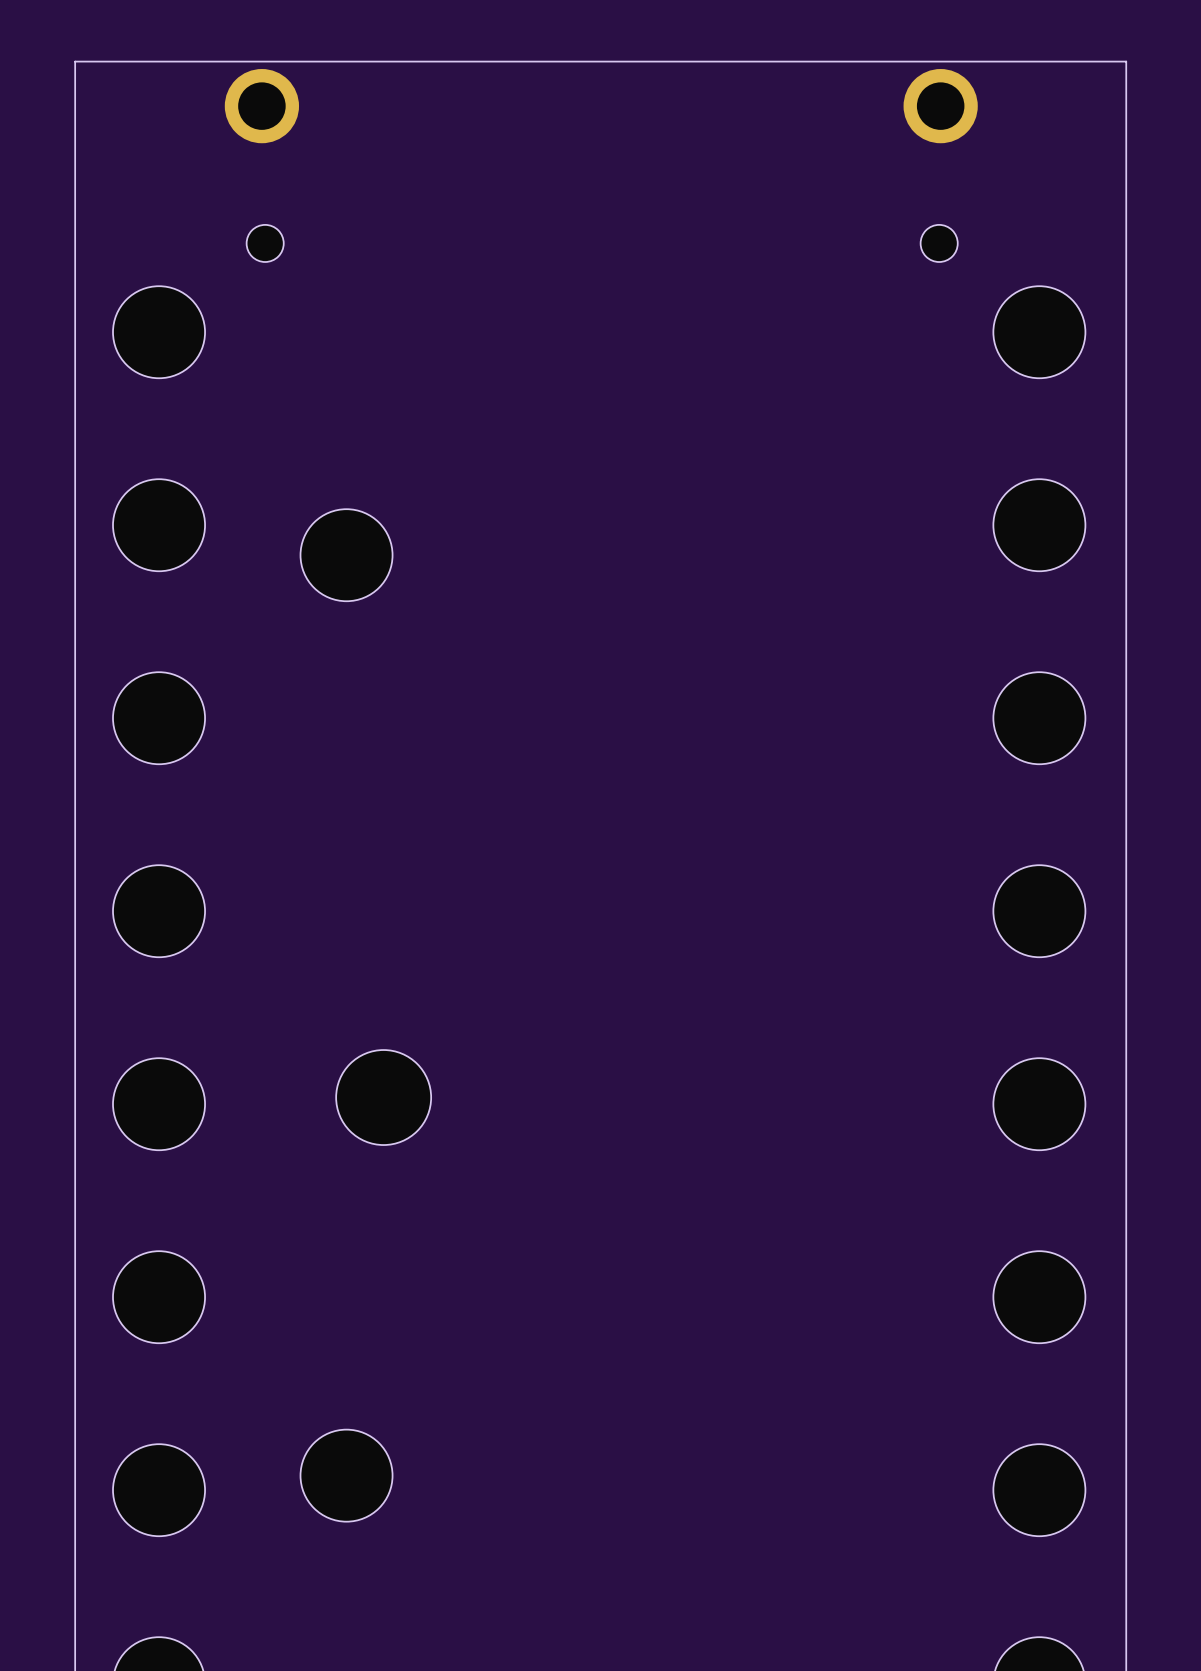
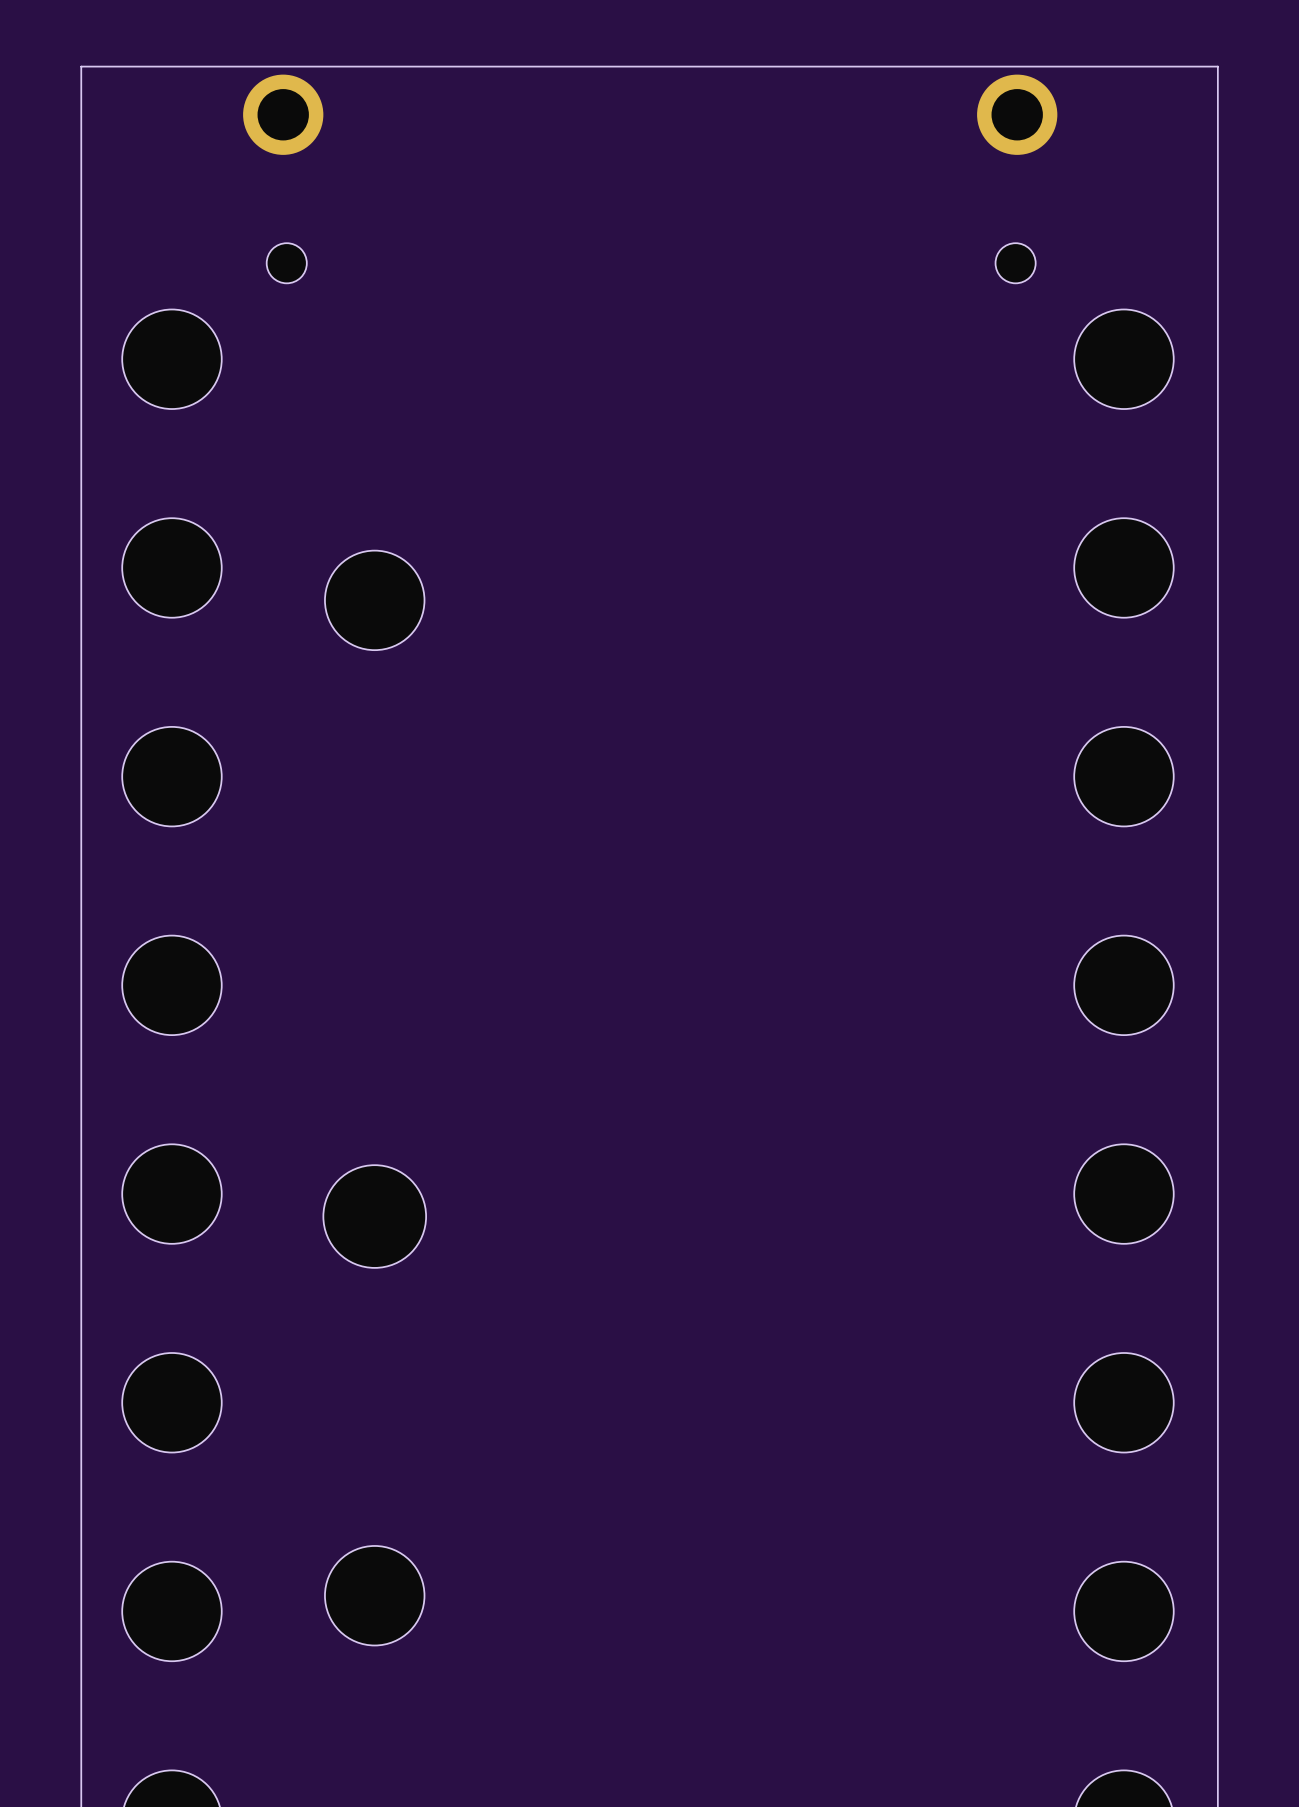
part position: (383, 1097) -> (374, 1216)

